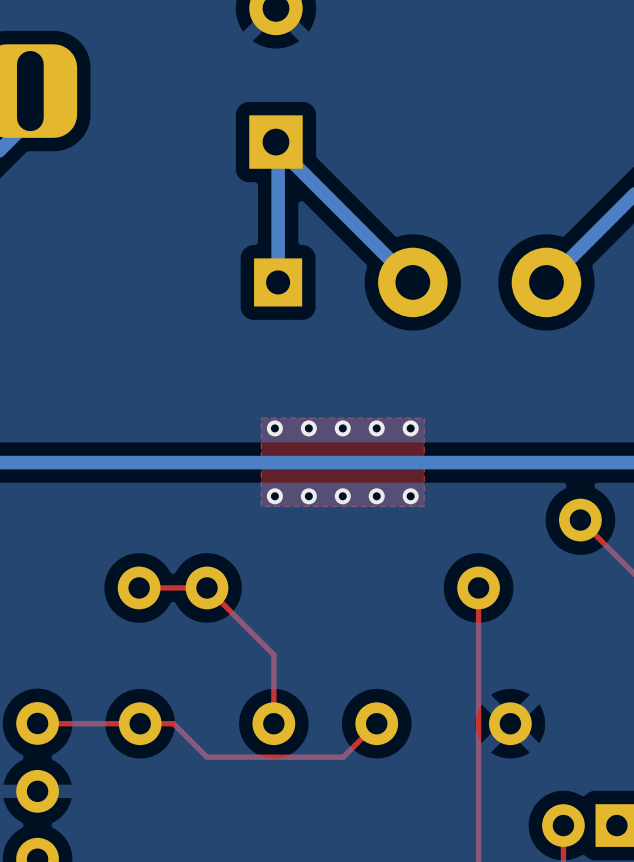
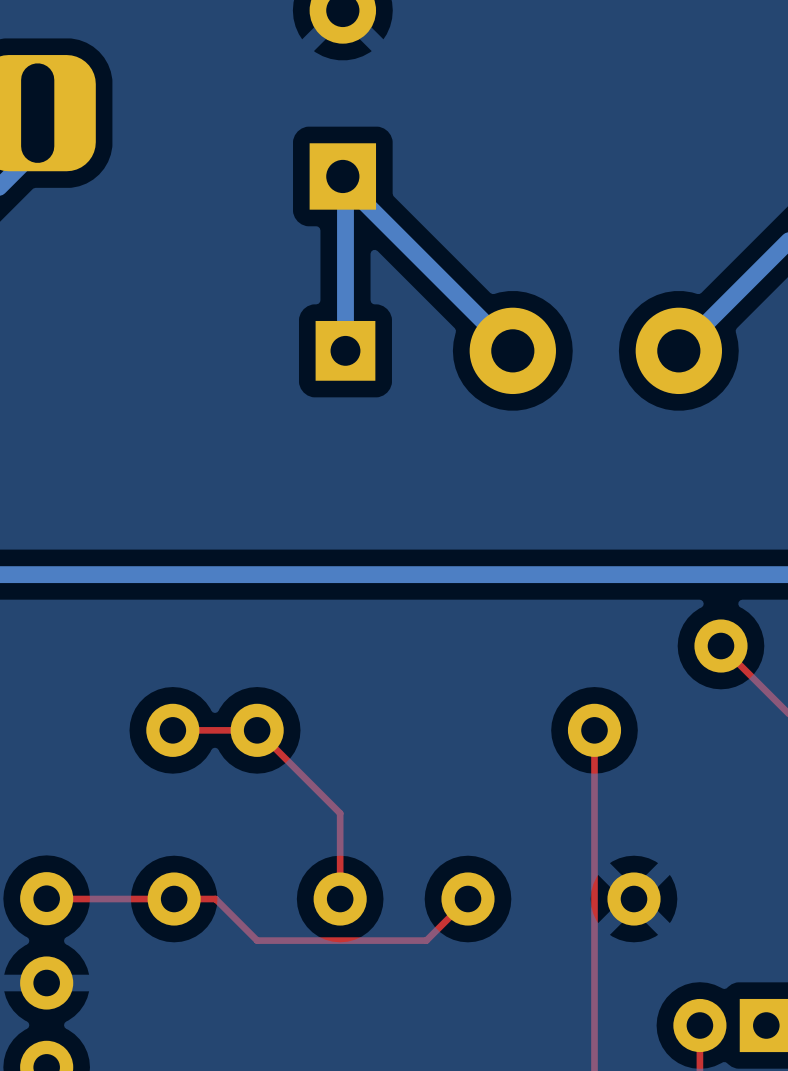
top zone outline: (424, 418) (424, 506) (261, 506) (261, 418) (424, 418) -> none
via: (274, 428) -> none
via: (308, 428) -> none
via: (342, 428) -> none
via: (376, 428) -> none
via: (410, 428) -> none
via: (274, 496) -> none
via: (308, 496) -> none
via: (342, 496) -> none
via: (376, 496) -> none
via: (410, 496) -> none

